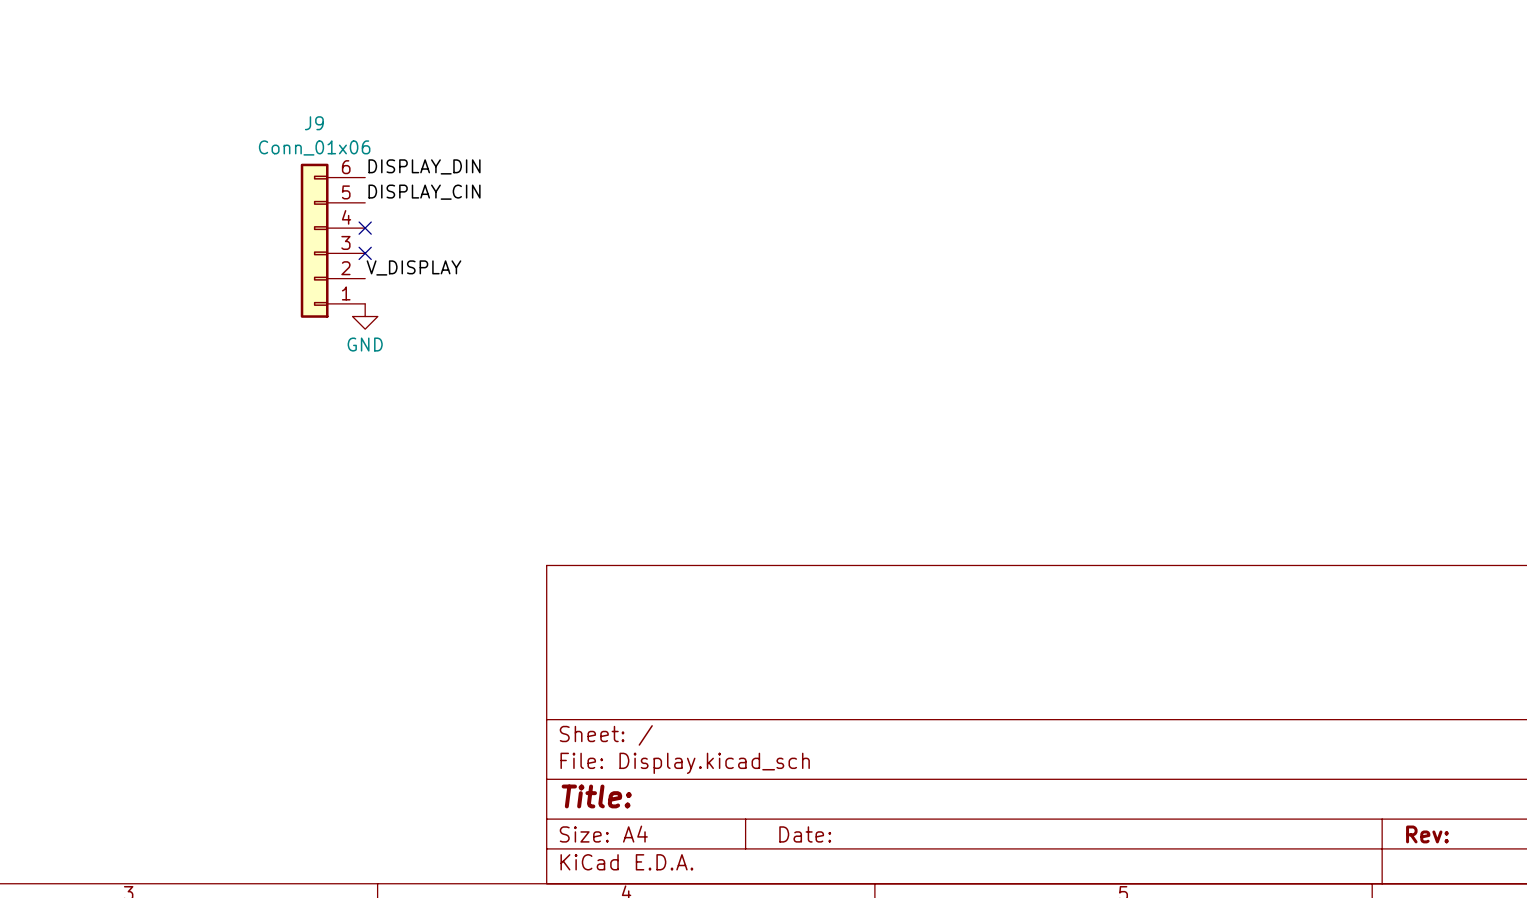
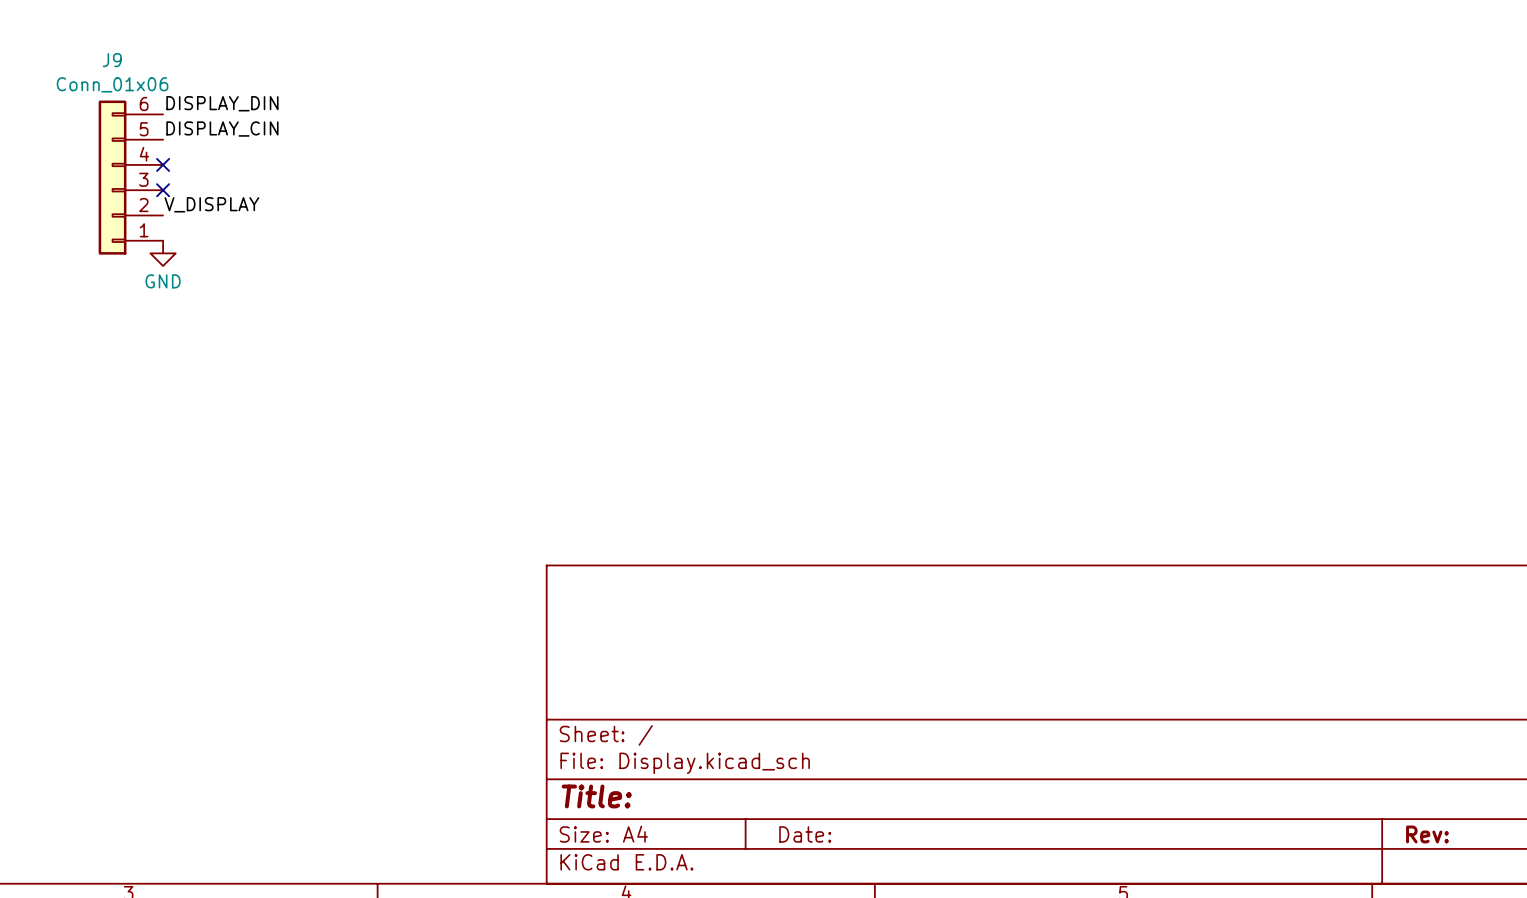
no-connect mark: none -> (163, 164)
label position: DISPLAY_DIN (424, 166) -> DISPLAY_DIN (222, 103)
no-connect mark: none -> (163, 190)
label position: DISPLAY_CIN (424, 192) -> DISPLAY_CIN (222, 129)
no-connect mark: (365, 228) -> none
J9 position: (332, 240) -> (130, 177)
no-connect mark: (365, 253) -> none
label position: V_DISPLAY (413, 267) -> V_DISPLAY (211, 204)
power symbol position: GND (365, 316) -> GND (163, 253)

